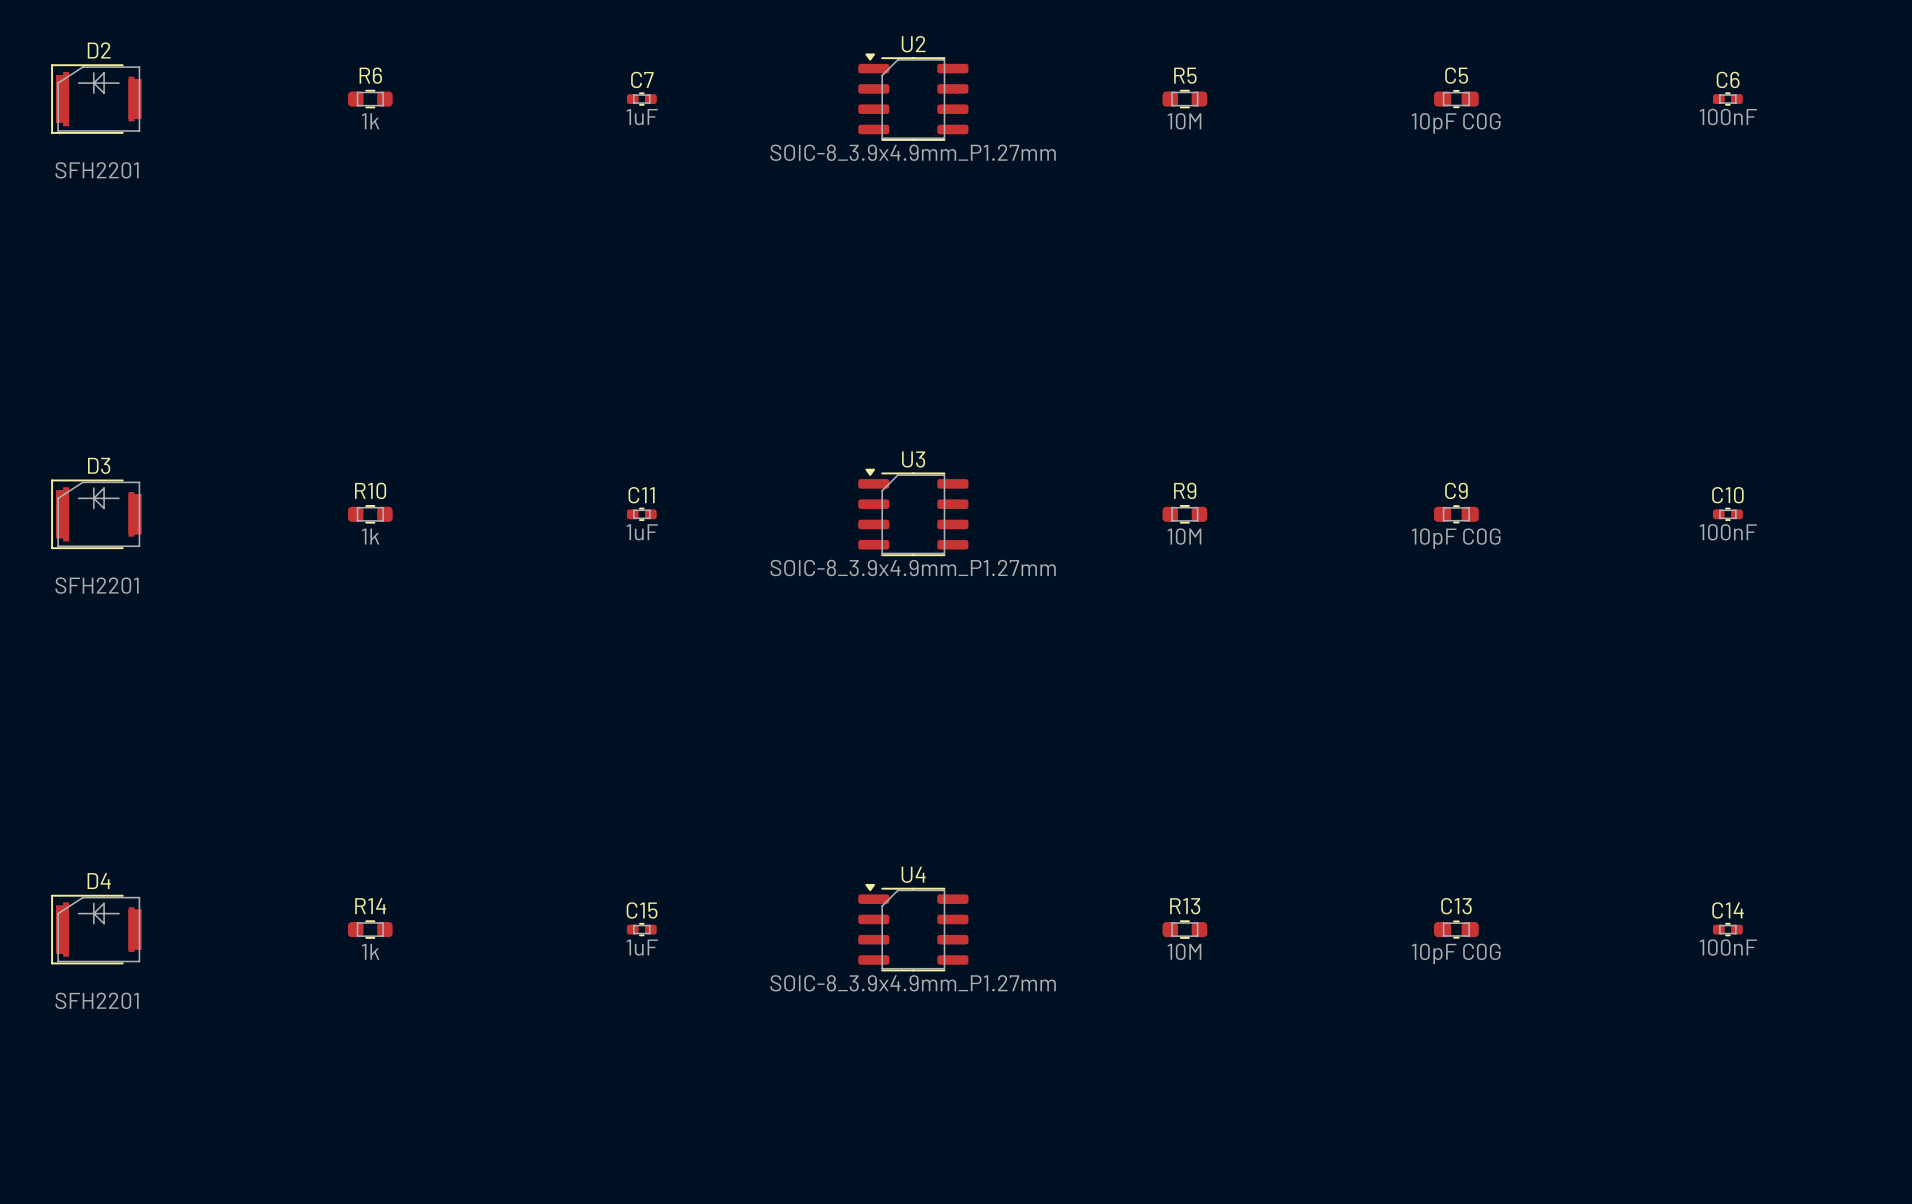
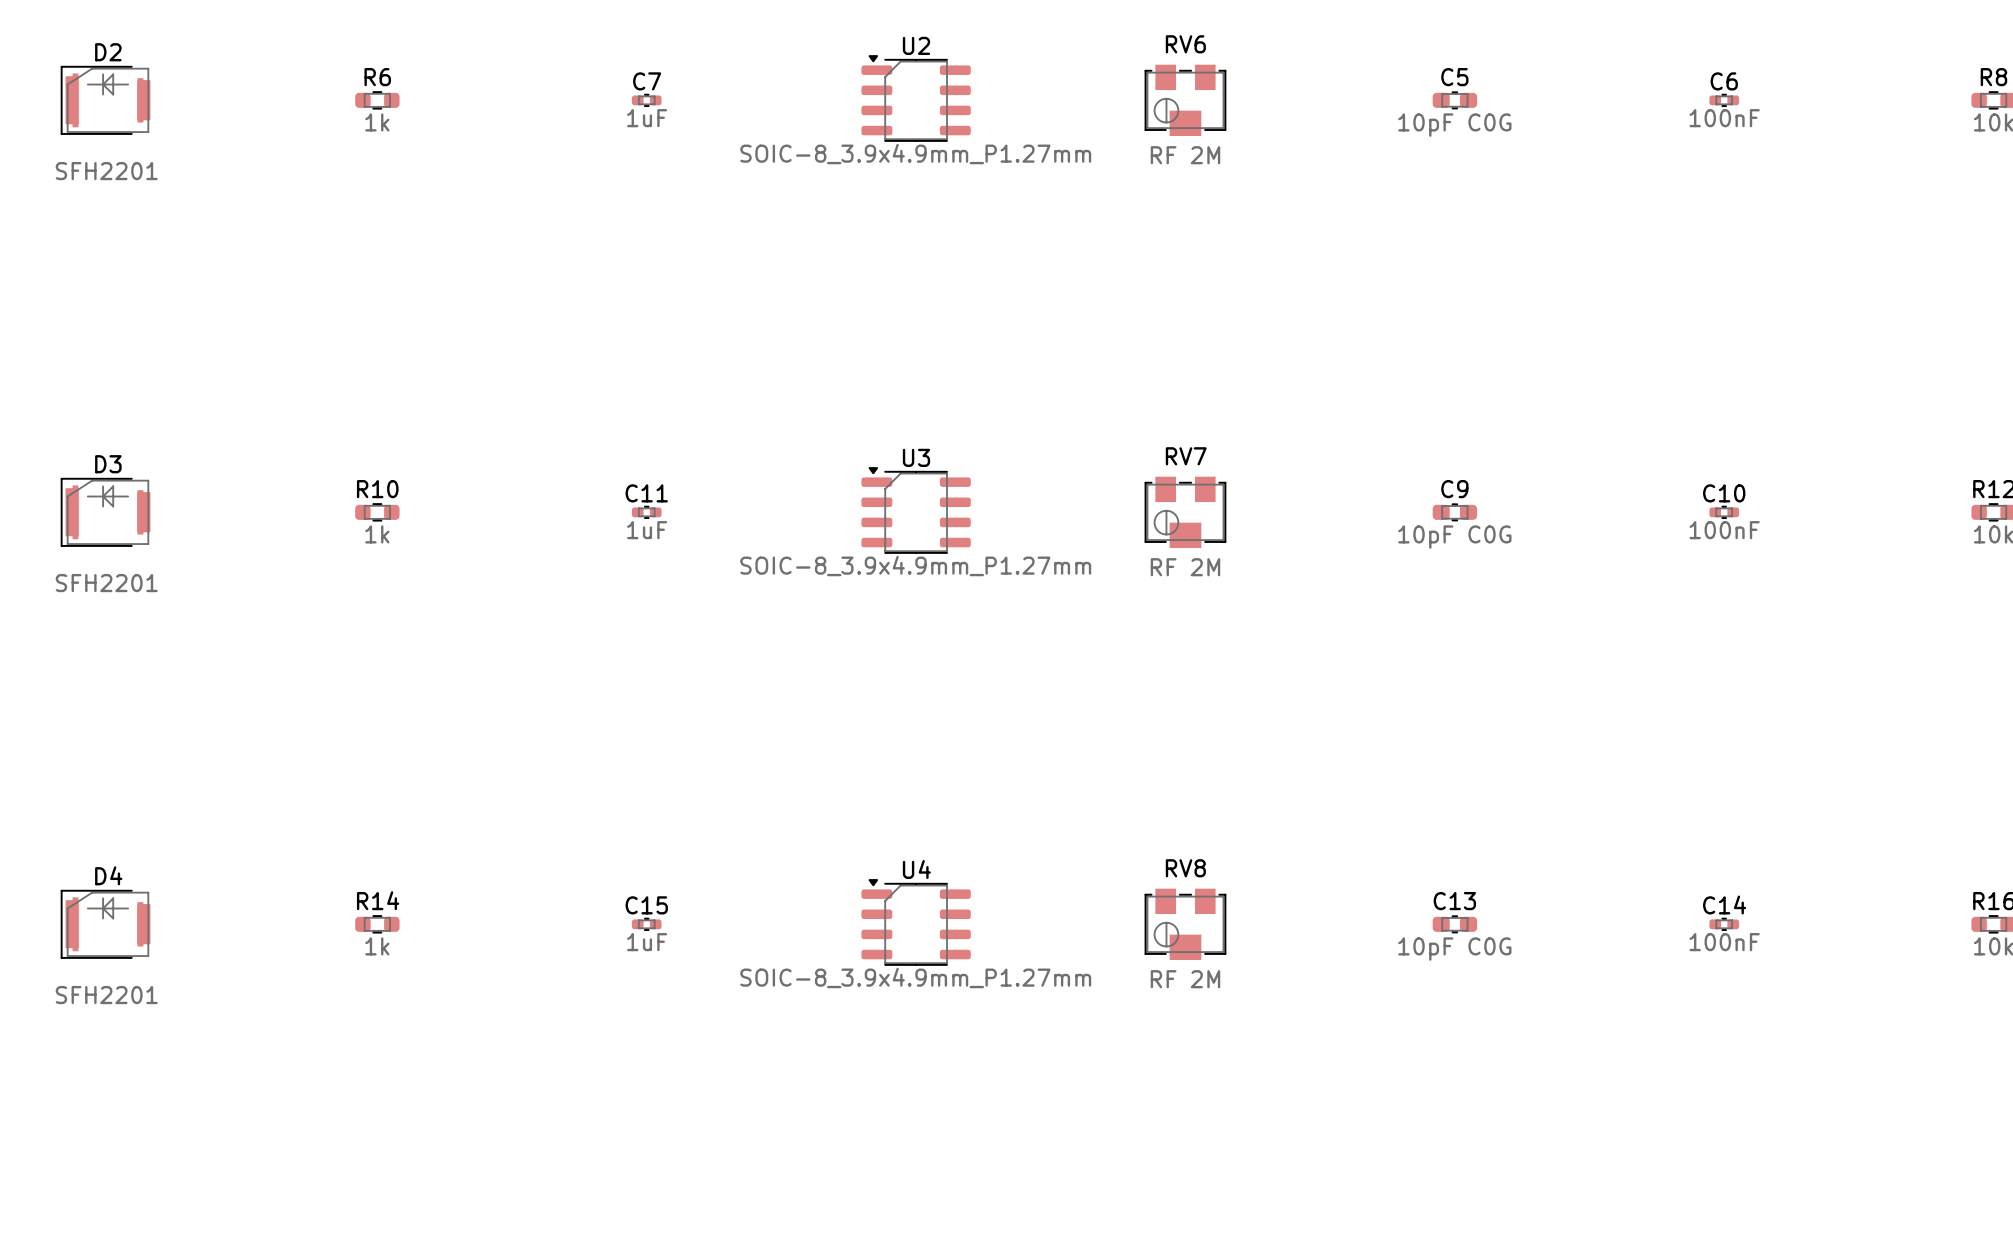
R5: 10M (1184, 99) -> none
RV6: none -> RF 2M (1185, 100)
R9: 10M (1184, 514) -> none
RV7: none -> RF 2M (1185, 512)
R13: 10M (1184, 929) -> none
RV8: none -> RF 2M (1185, 924)

